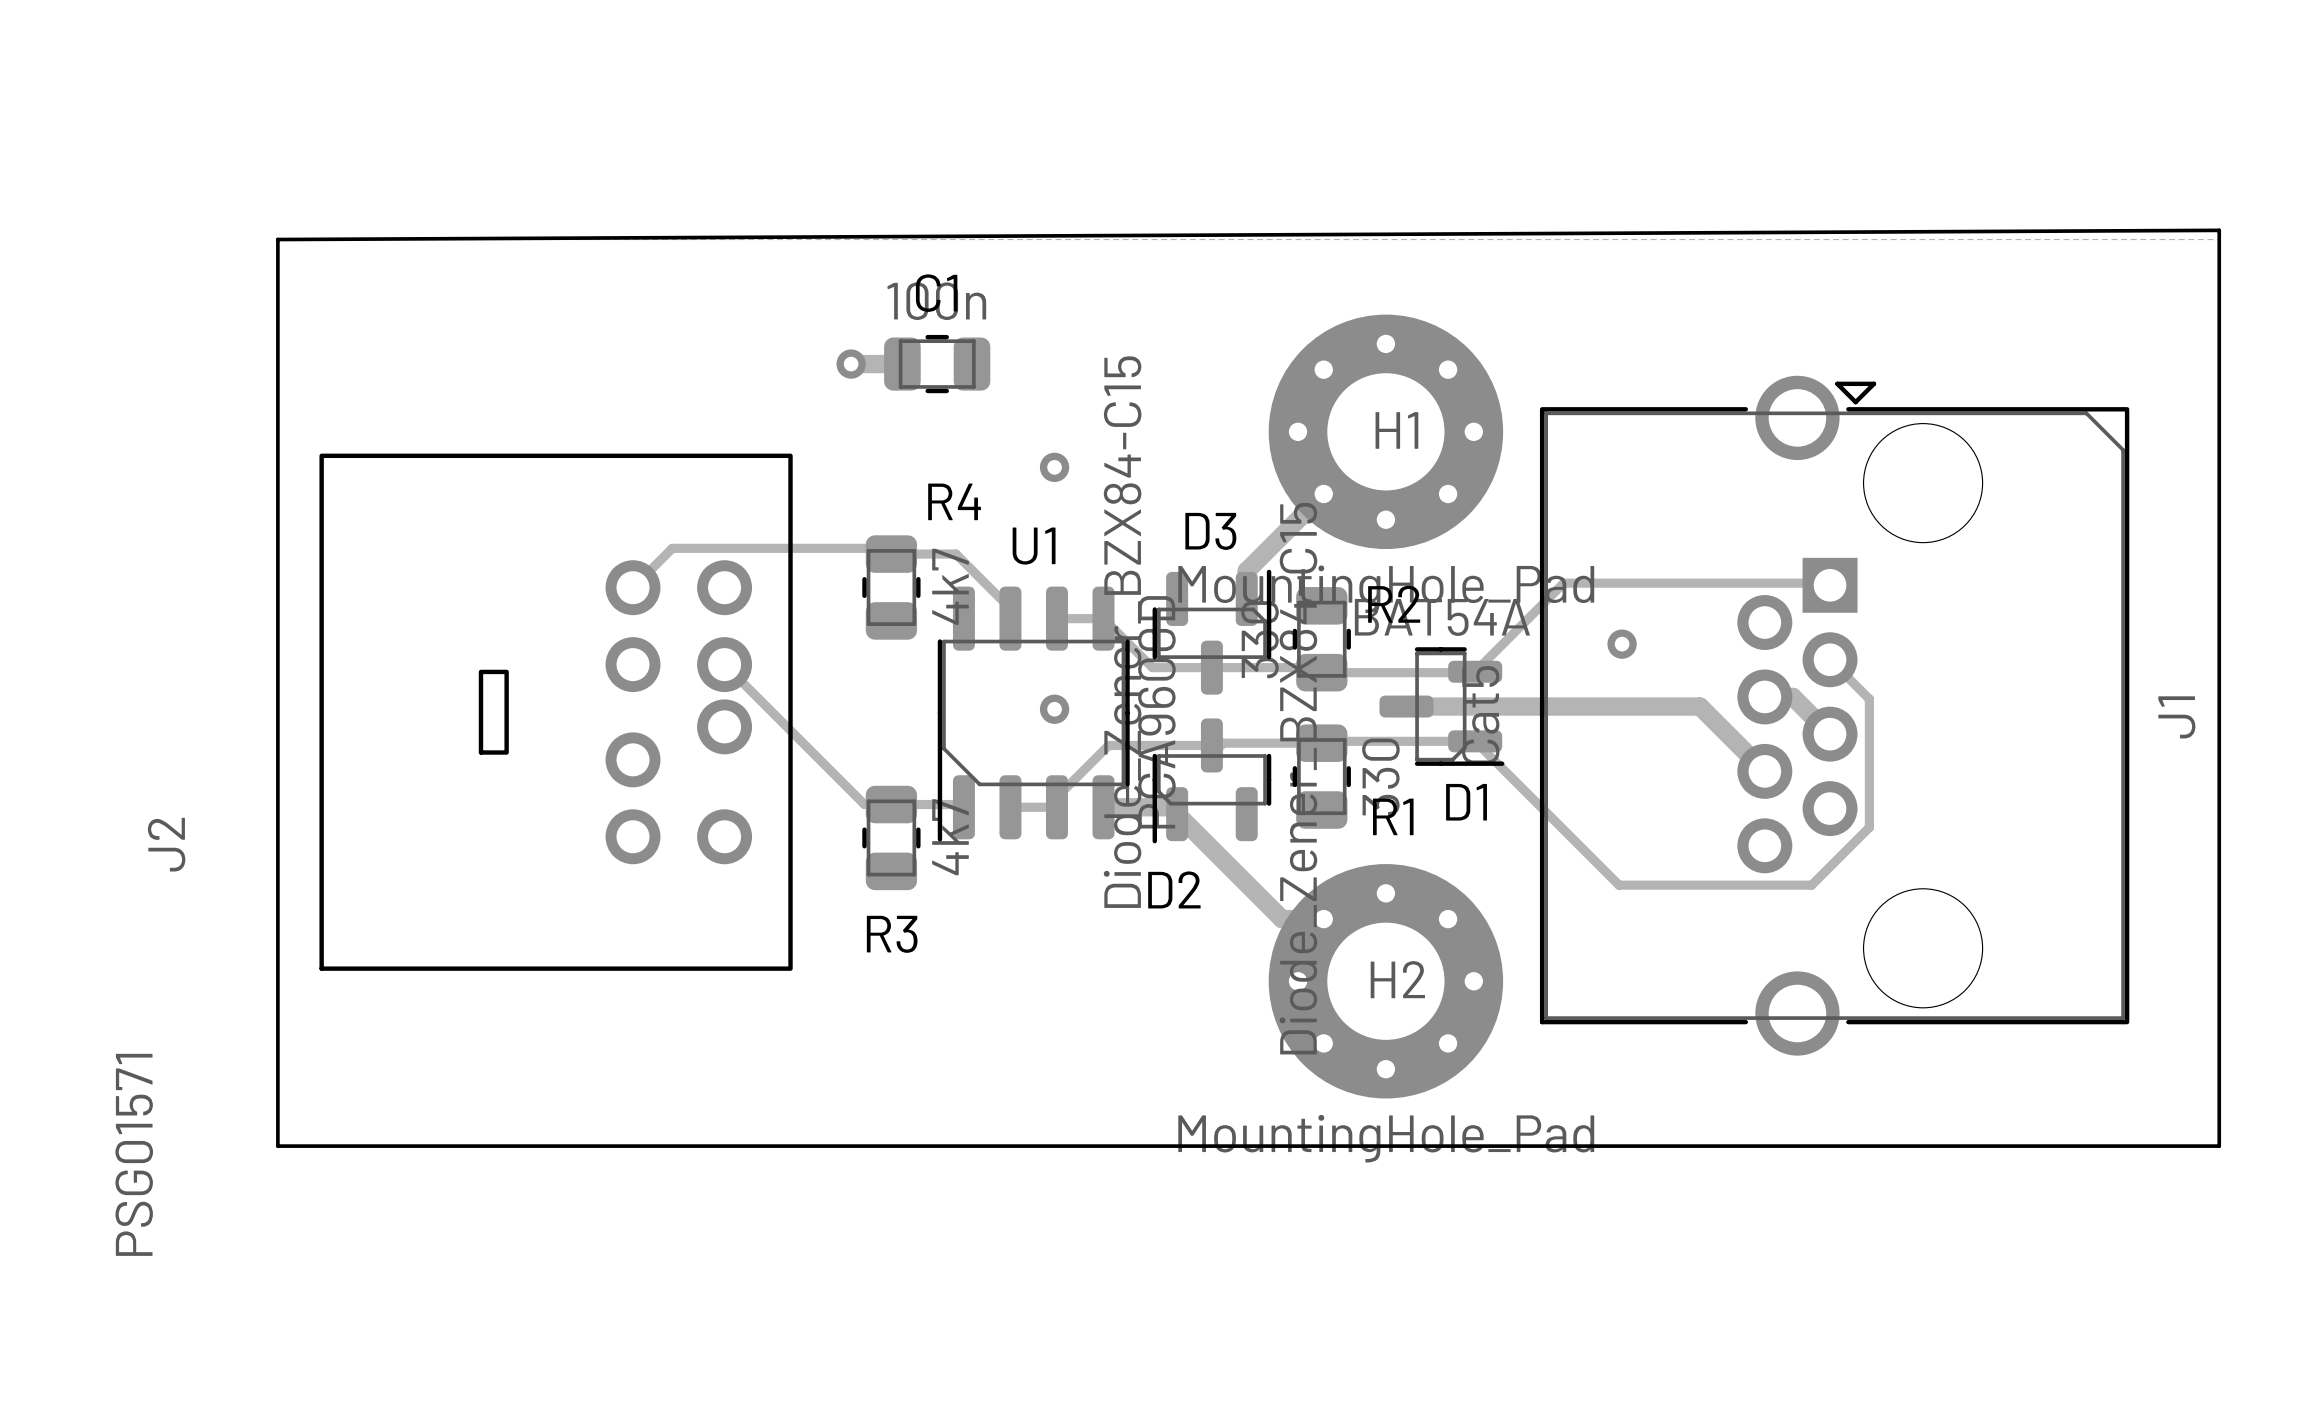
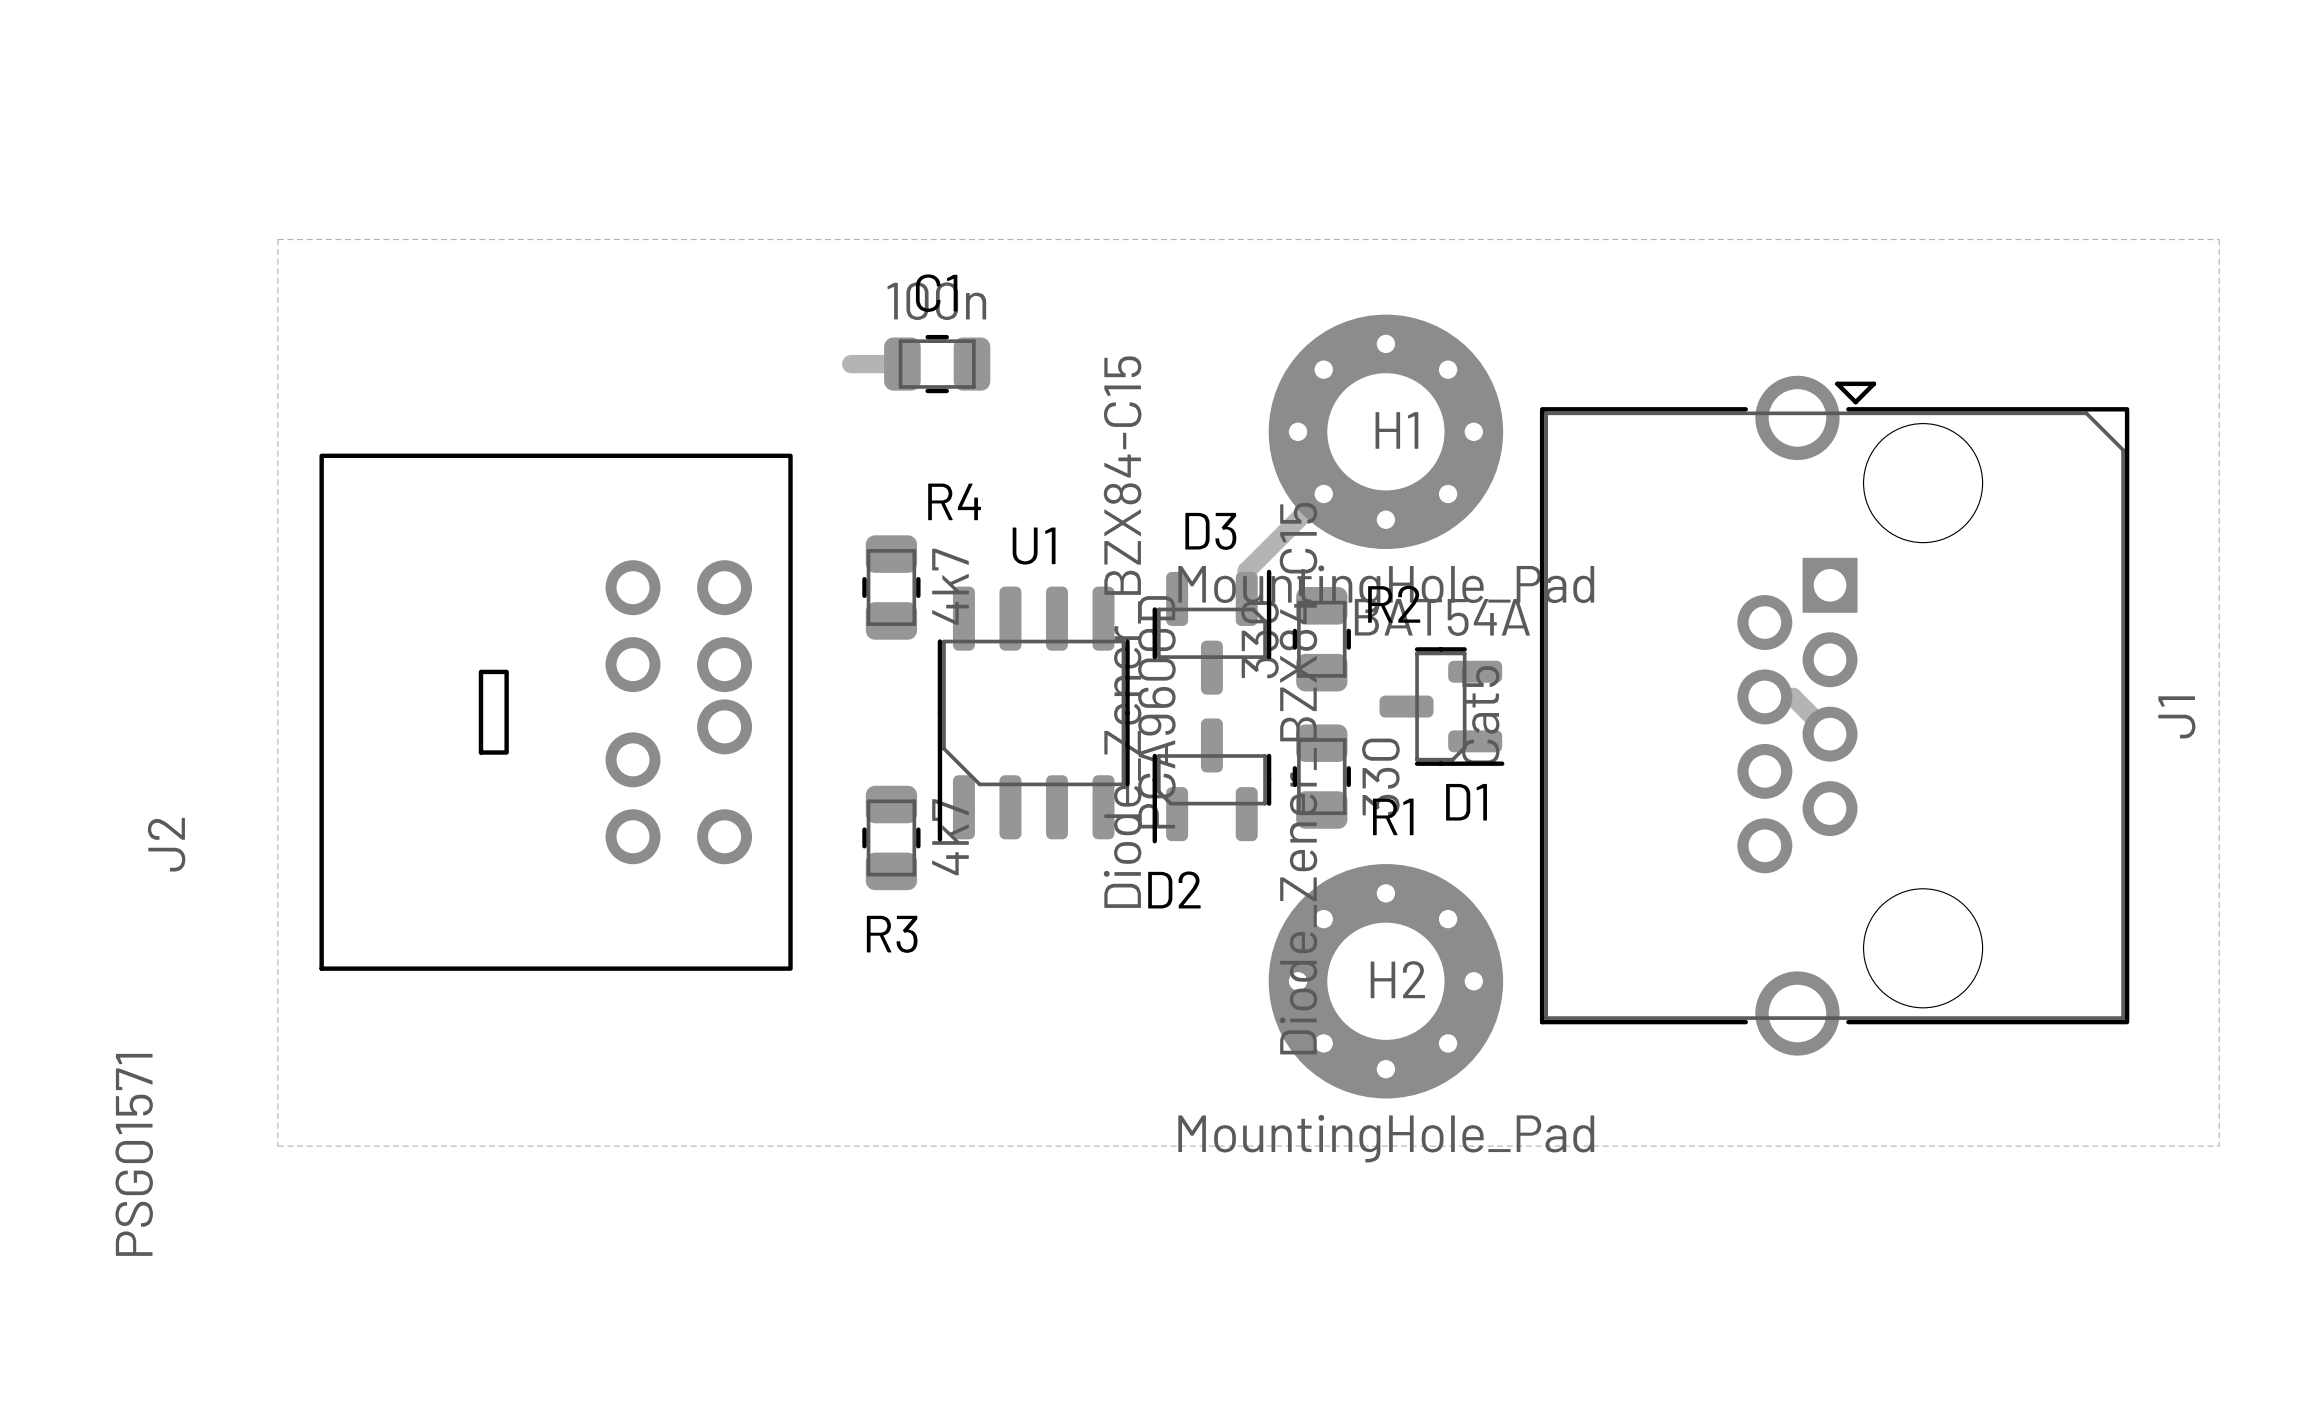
board edge: (2219, 230) (277, 239) (277, 1146) (2219, 1146) (2219, 230) -> none
via: (851, 364) -> none
via: (1054, 467) -> none
track: (1830, 585) (1827, 583) (1563, 583) (1474, 672) (1321, 672) (1316, 667) (1152, 667) (1103, 618) (1056, 618) -> none
track: (633, 587) (672, 548) (885, 548) (891, 554) (956, 554) (1010, 608) (1010, 618) -> none
via: (1622, 644) -> none
track: (1830, 659) (1869, 699) (1869, 827) (1811, 885) (1619, 885) (1475, 741) (1223, 743) (1211, 754) -> none
track: (724, 664) (864, 804) (961, 804) (963, 807) -> none
track: (1406, 706) (1700, 706) (1764, 771) -> none
via: (1054, 709) -> none
track: (1211, 745) (1108, 745) (1056, 797) (1056, 807) (1010, 807) -> none
track: (1103, 807) (1170, 807) (1282, 919) (1323, 919) -> none

